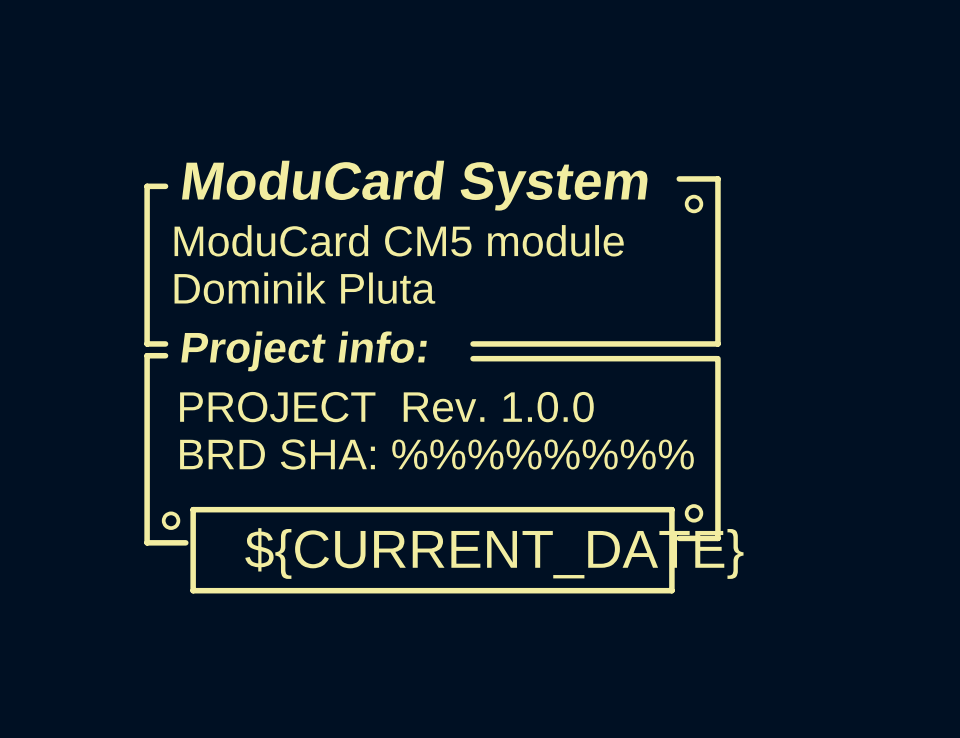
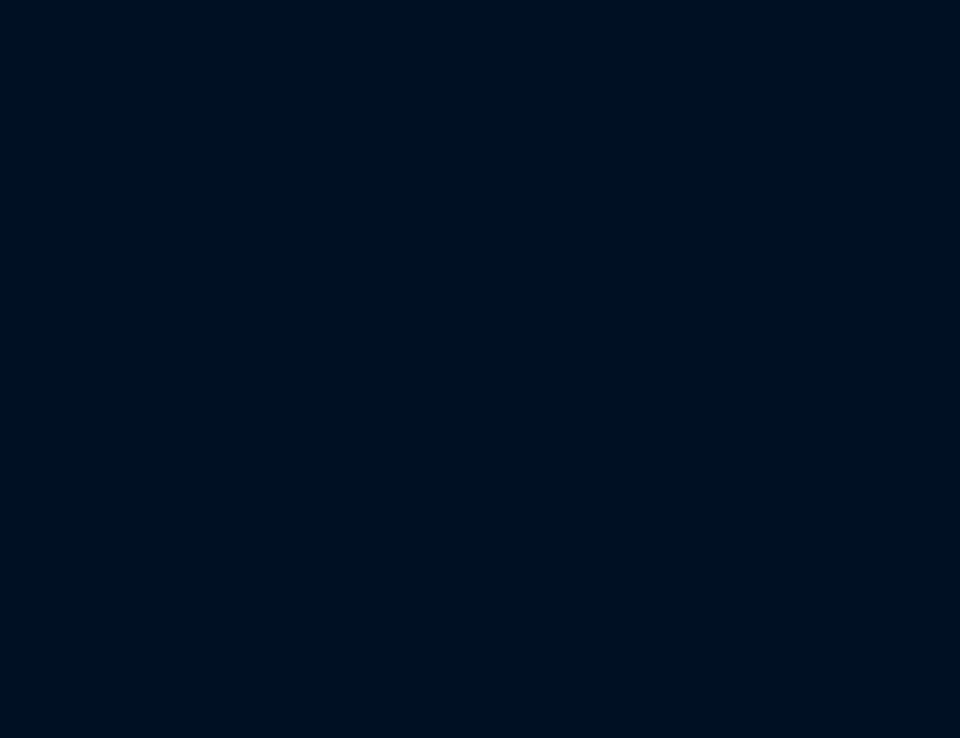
line: (679, 178) (717, 178) (717, 343) (473, 343) -> none
text: ModuCard System (414, 185) -> none
line: (165, 186) (147, 186) (147, 343) (165, 343) -> none
drawing: [684, 194, 704, 214] -> none
text: ModuCard CM5 module (399, 240) -> none
text: Dominik Pluta (304, 288) -> none
text: Project info: (304, 351) -> none
line: (165, 355) (147, 355) (147, 542) (185, 542) -> none
line: (473, 358) (717, 358) -> none
line: (717, 358) (717, 538) (679, 538) -> none
text: PROJECT Rev. 1.0.0 (386, 407) -> none
text: BRD SHA: %%%%%%%% (436, 454) -> none
drawing: [684, 504, 704, 523] -> none
line: (193, 509) (671, 509) (671, 590) (193, 590) (193, 509) -> none
drawing: [161, 511, 181, 530] -> none
text: ${CURRENT_DATE} (494, 553) -> none

